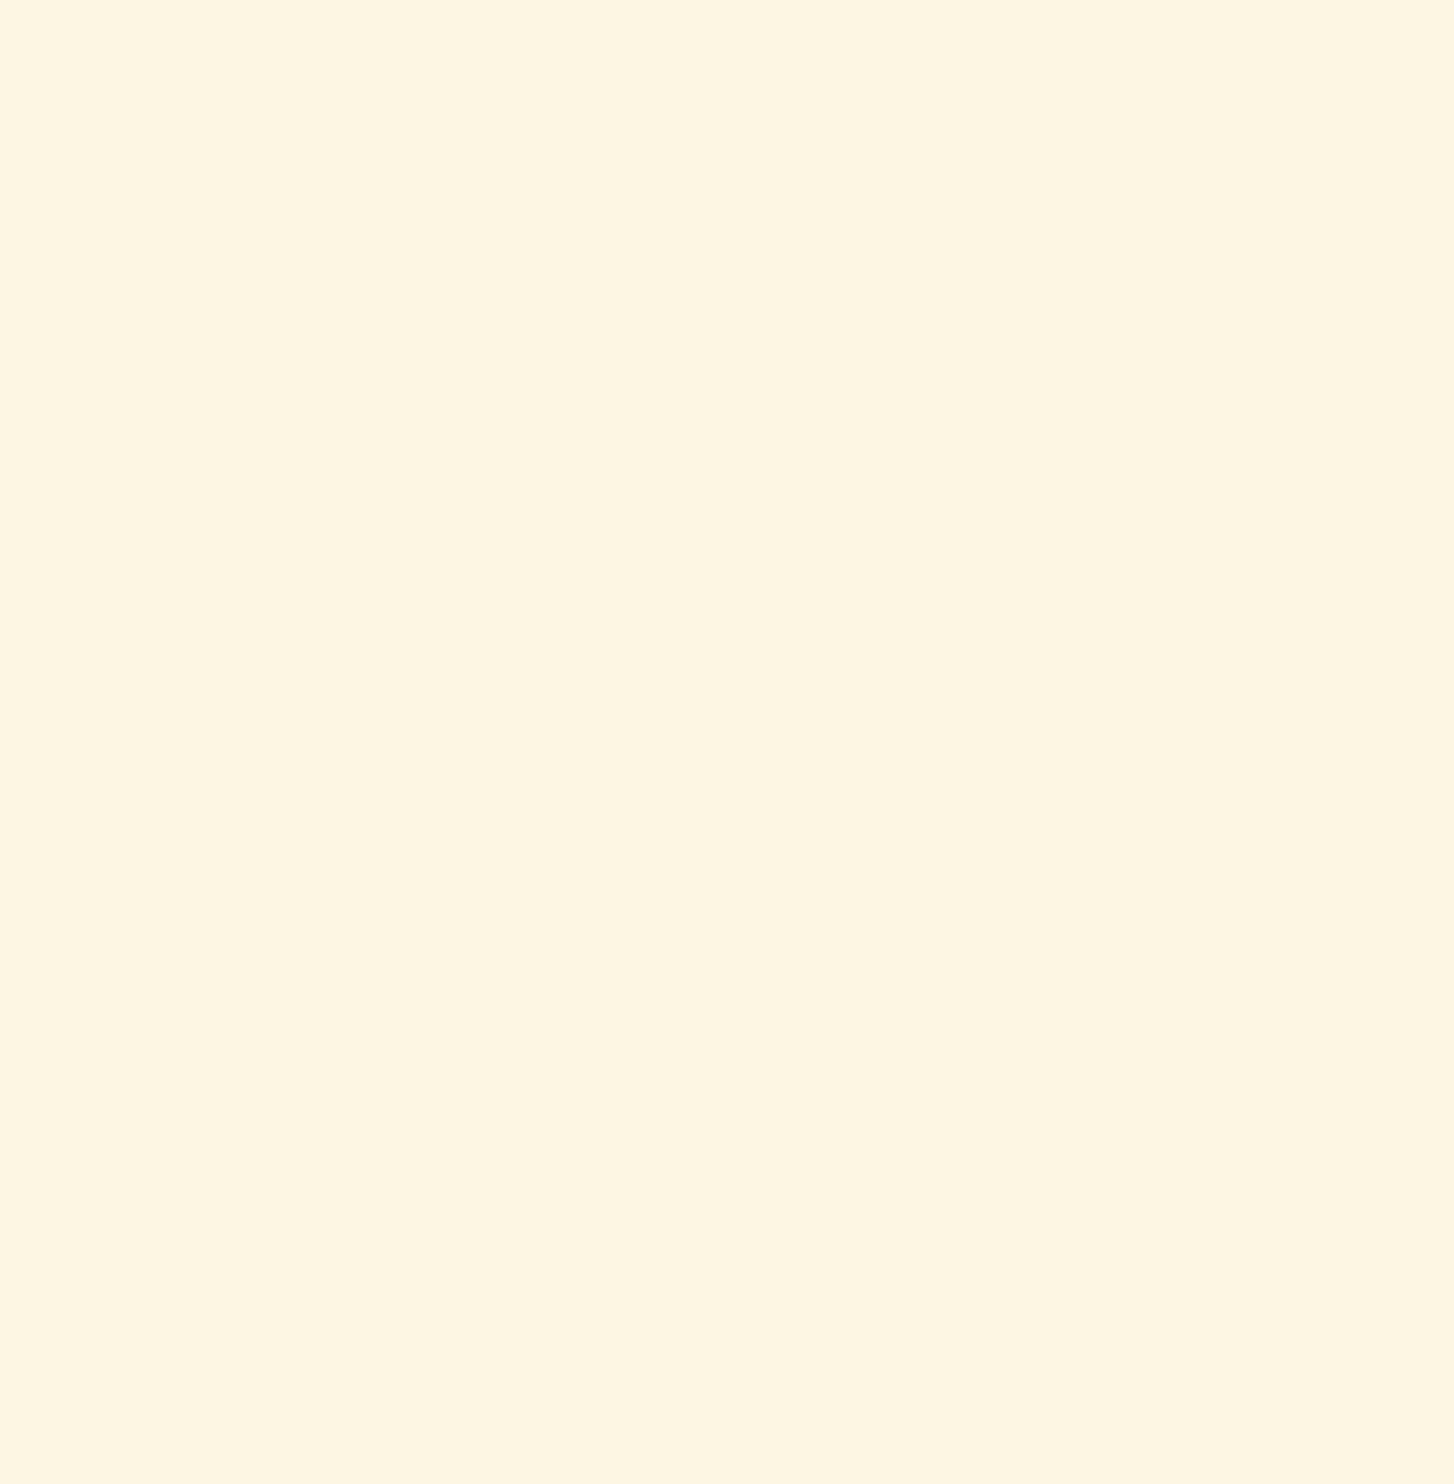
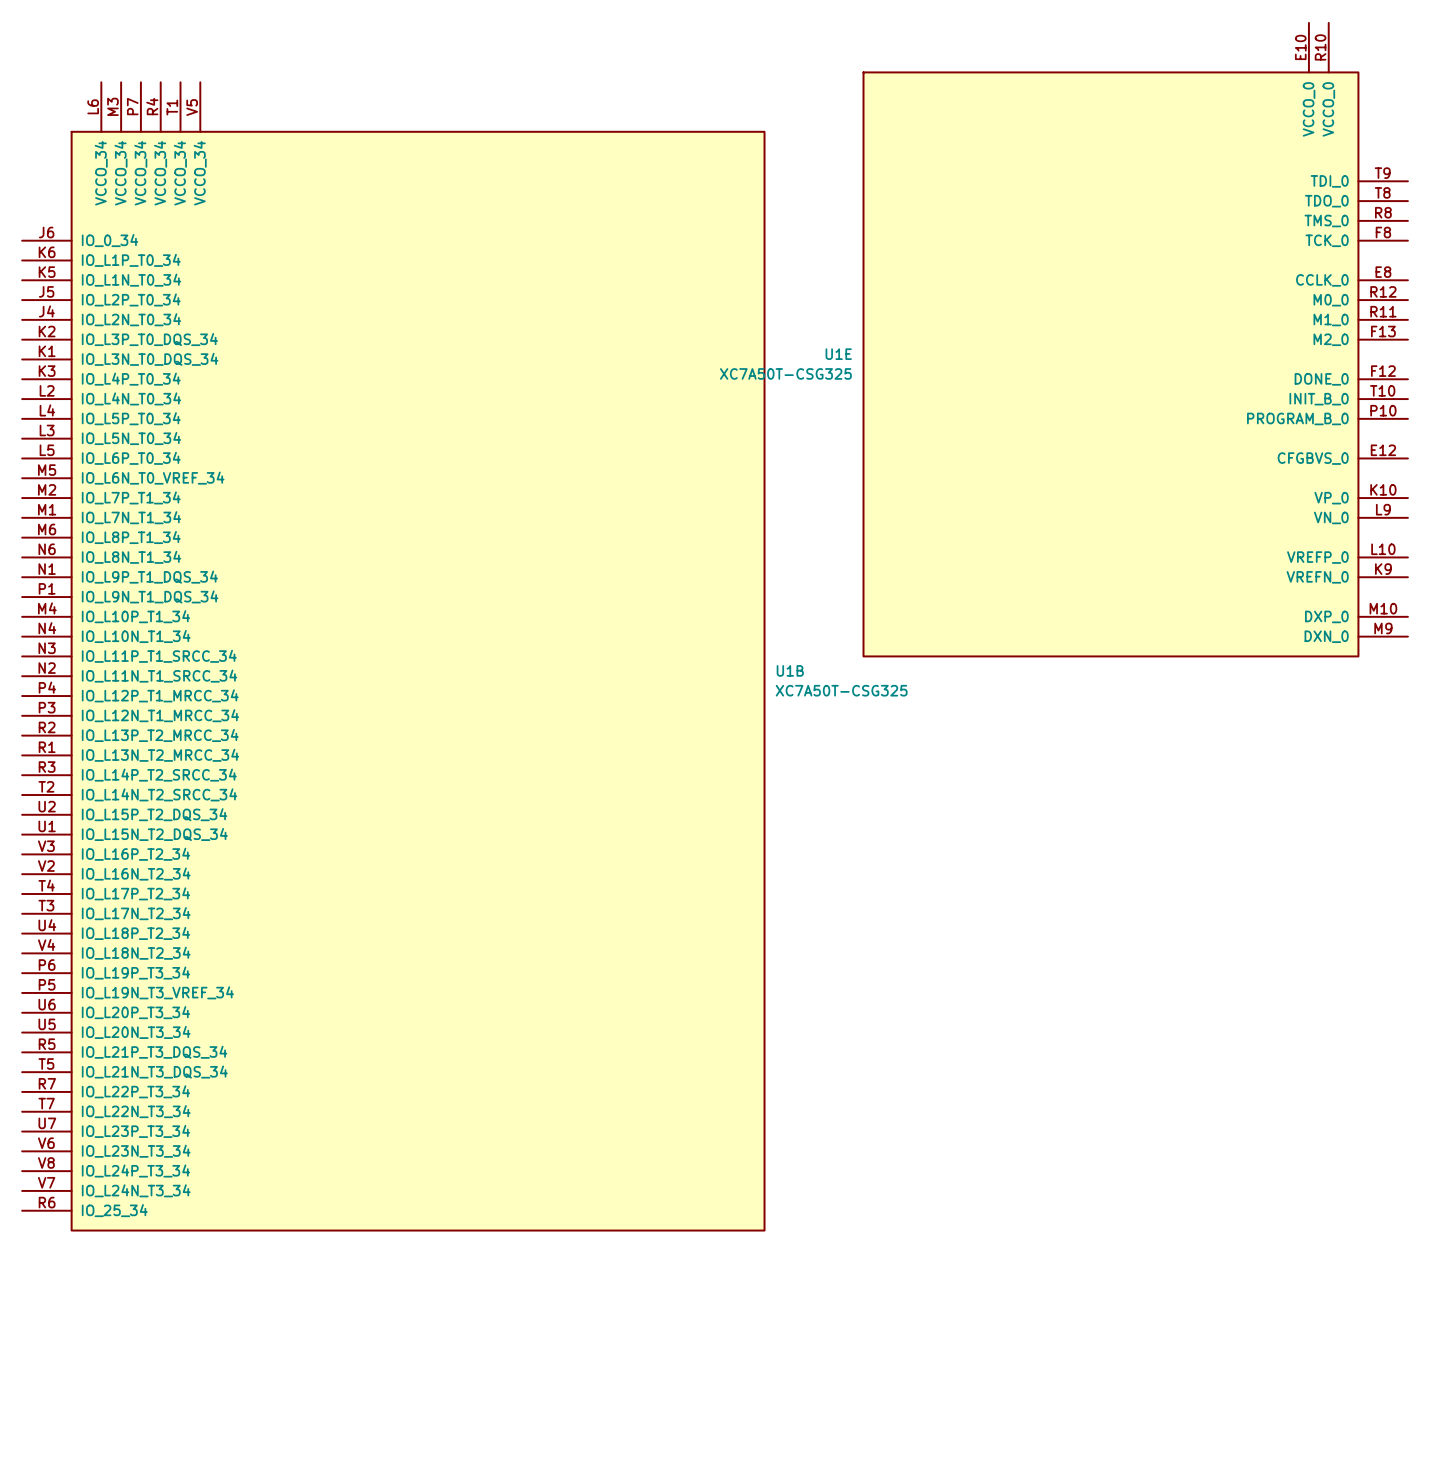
U1E: none -> XC7A50T-CSG325 (1135, 340)
U1B: none -> XC7A50T-CSG325 (393, 656)

